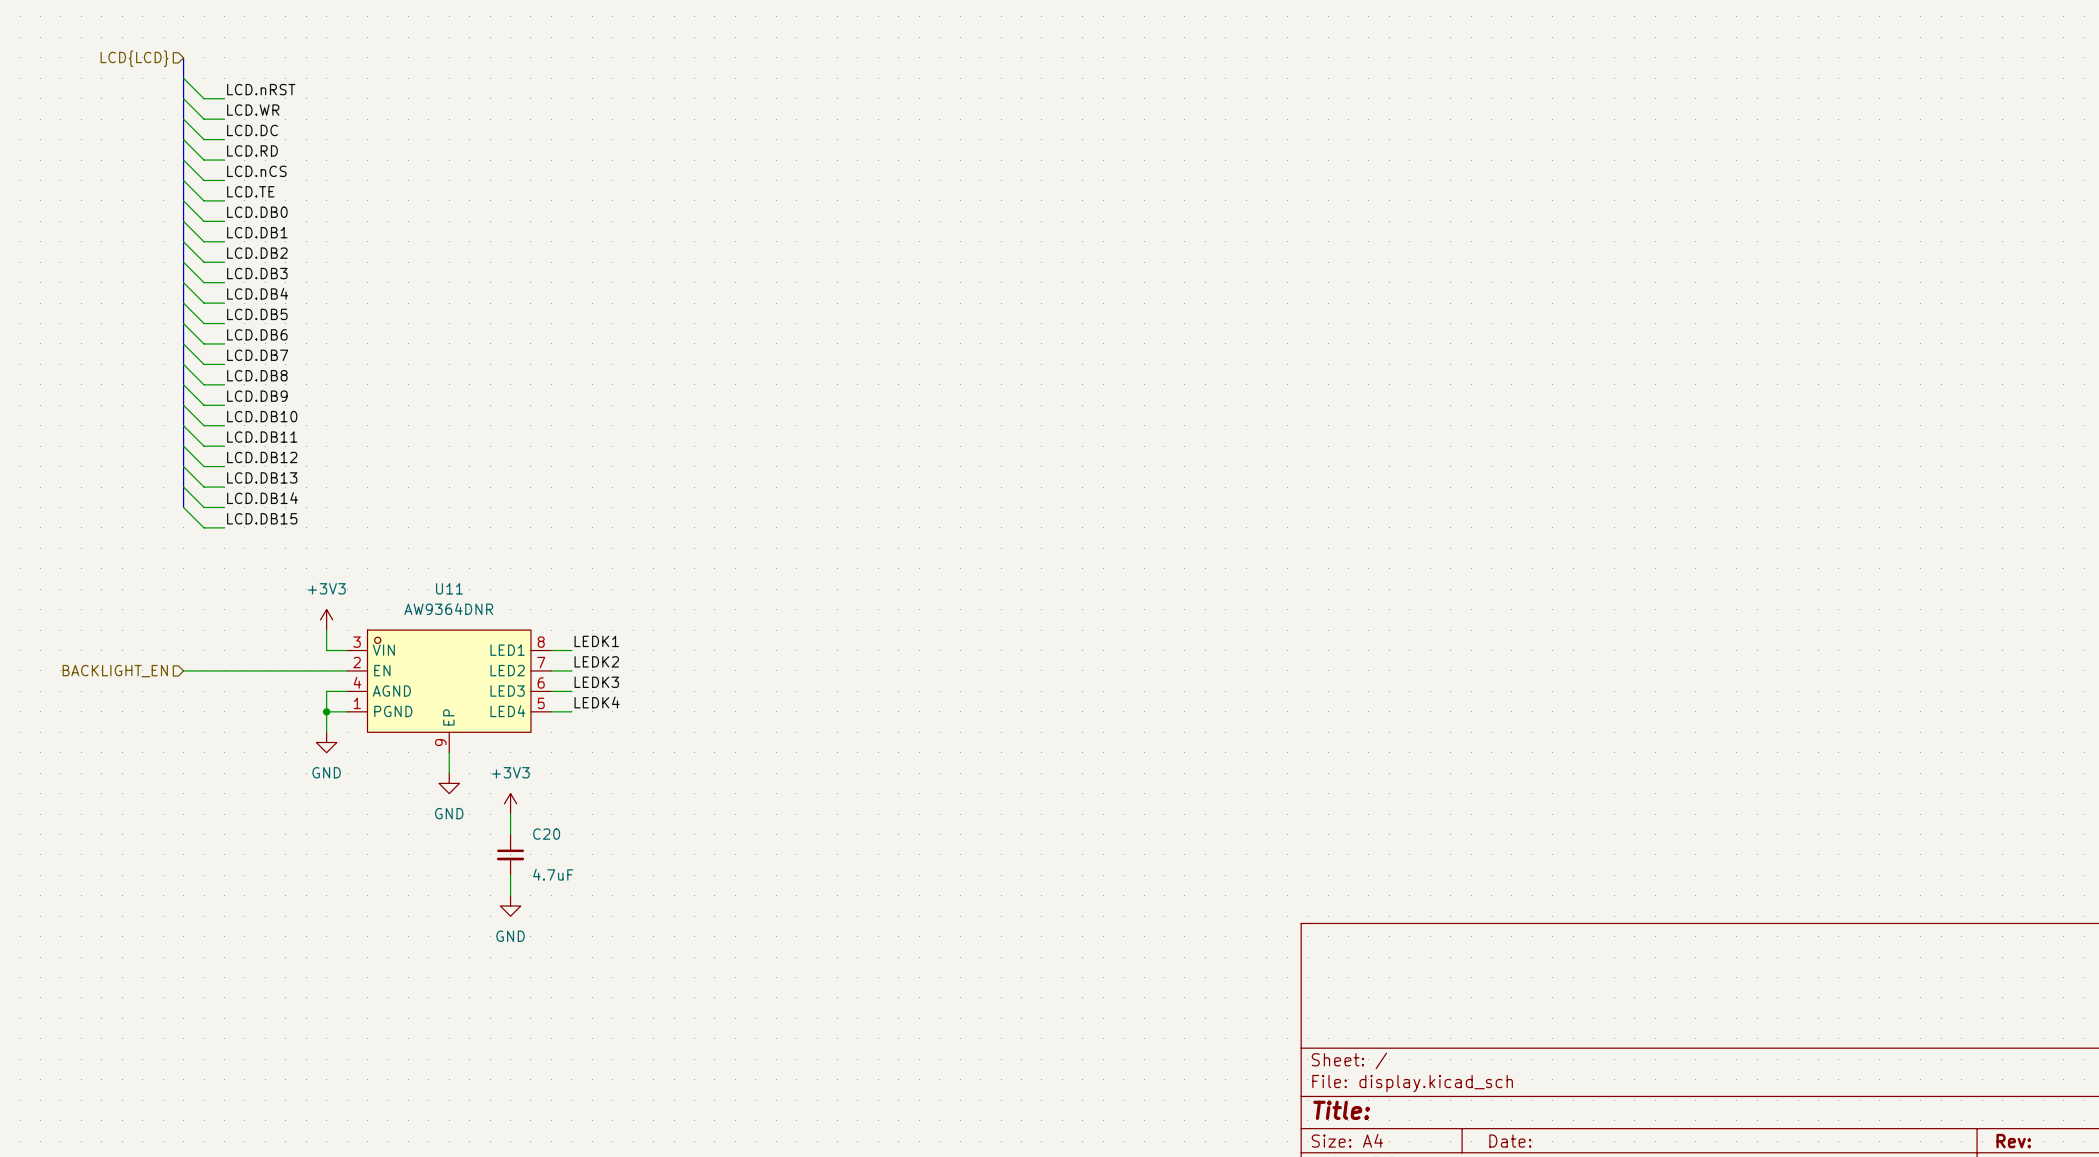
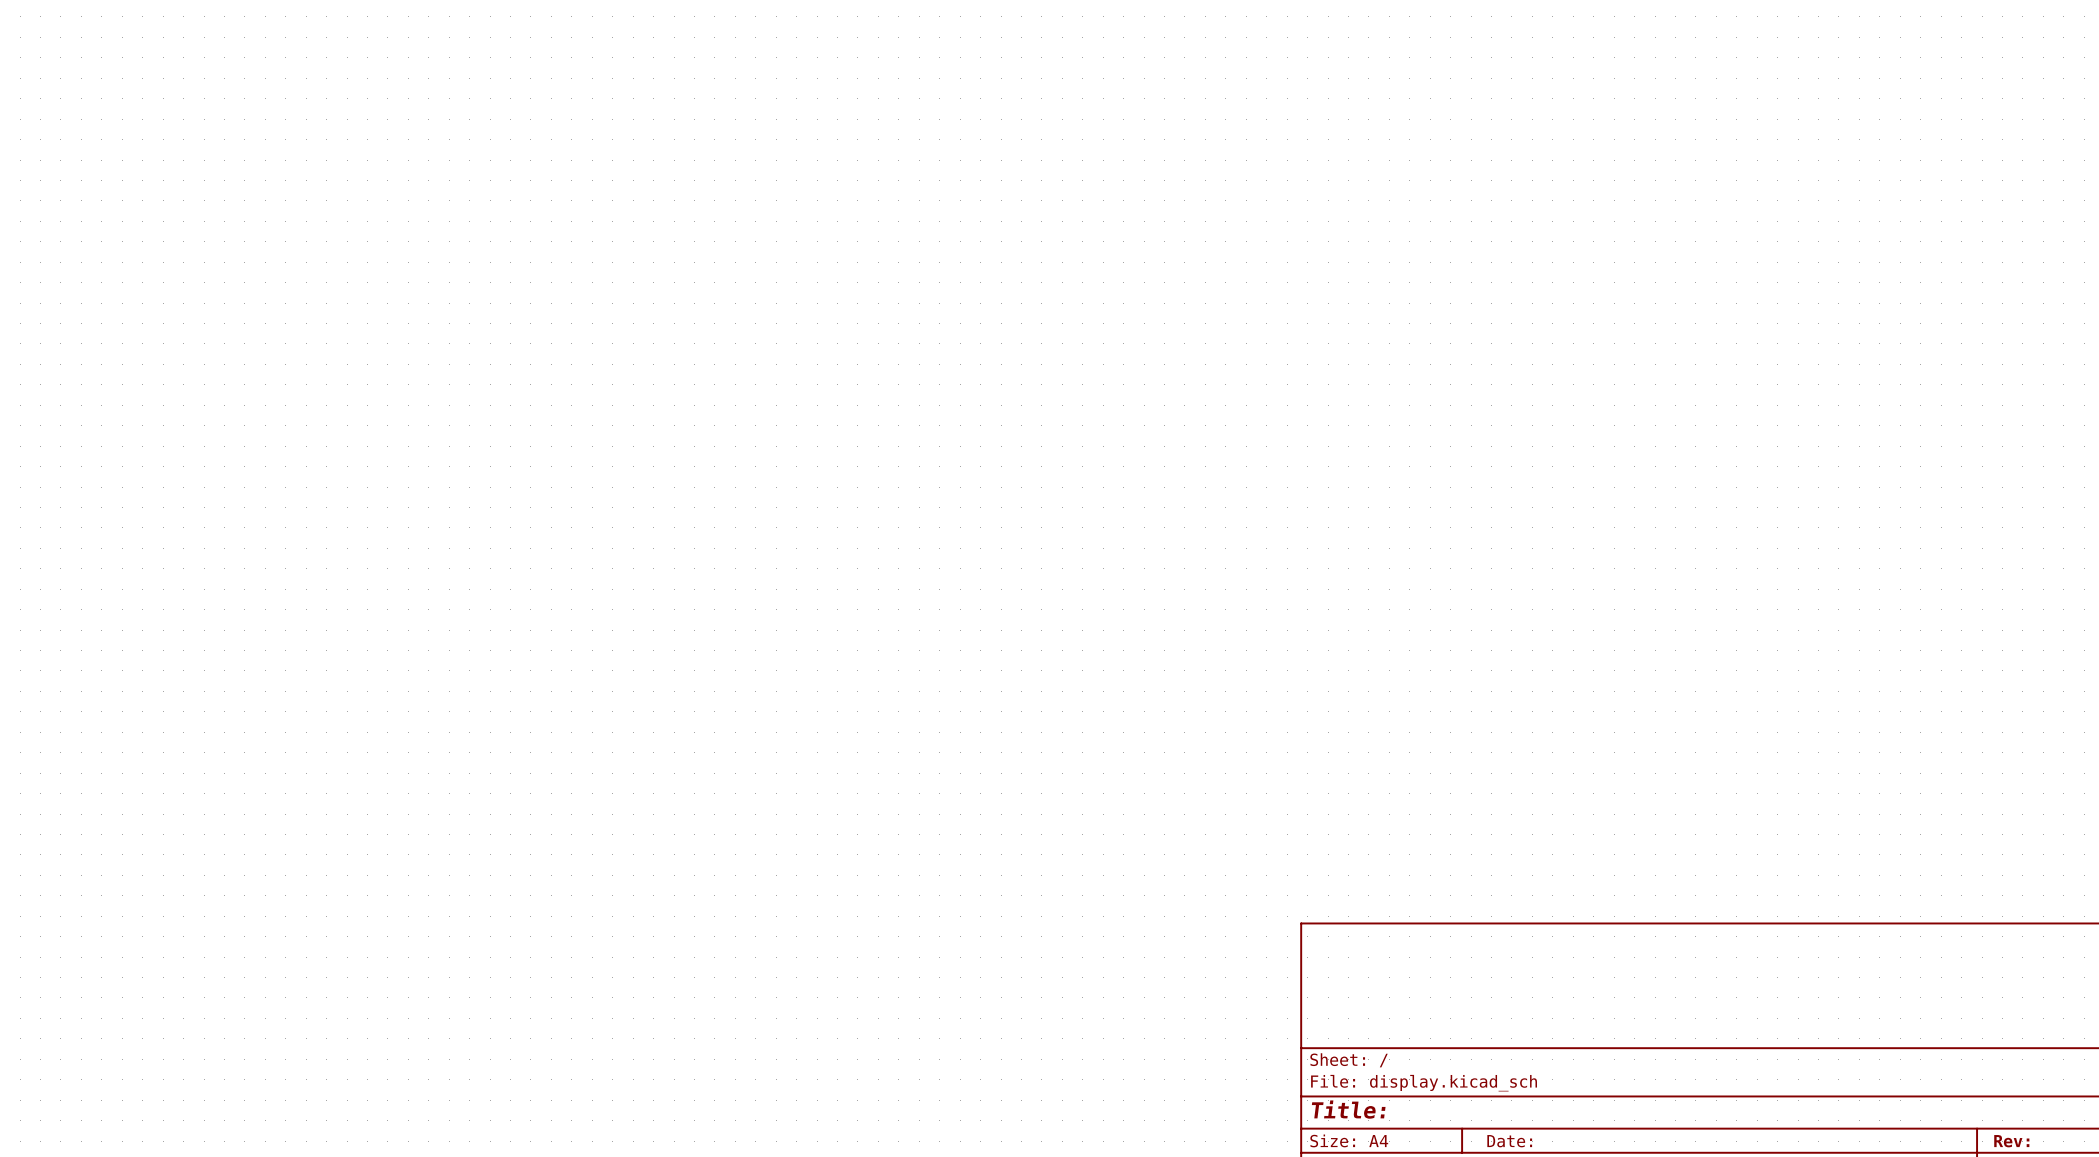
bus: (183, 57) (183, 507) -> none
hierarchical label: LCD{LCD} (134, 58) -> none
wire: (183, 78) (204, 98) (224, 98) -> none
label: LCD.nRST (261, 89) -> none
wire: (183, 98) (204, 119) (224, 119) -> none
label: LCD.WR (253, 110) -> none
wire: (183, 119) (204, 139) (224, 139) -> none
label: LCD.DC (252, 130) -> none
wire: (183, 139) (204, 160) (224, 160) -> none
label: LCD.RD (252, 150) -> none
wire: (183, 160) (204, 180) (224, 180) -> none
label: LCD.nCS (256, 171) -> none
wire: (183, 180) (204, 200) (224, 200) -> none
label: LCD.TE (250, 191) -> none
wire: (183, 200) (204, 221) (224, 221) -> none
label: LCD.DB0 (257, 212) -> none
wire: (183, 221) (204, 241) (224, 241) -> none
label: LCD.DB1 (257, 232) -> none
wire: (183, 241) (204, 262) (224, 262) -> none
label: LCD.DB2 (257, 253) -> none
wire: (183, 262) (204, 282) (224, 282) -> none
label: LCD.DB3 (257, 273) -> none
wire: (183, 282) (204, 303) (224, 303) -> none
label: LCD.DB4 (257, 293) -> none
wire: (183, 303) (204, 323) (224, 323) -> none
label: LCD.DB5 (257, 314) -> none
wire: (183, 323) (204, 343) (224, 343) -> none
label: LCD.DB6 (257, 334) -> none
wire: (183, 343) (204, 364) (224, 364) -> none
label: LCD.DB7 (257, 355) -> none
wire: (183, 364) (204, 384) (224, 384) -> none
label: LCD.DB8 (257, 375) -> none
wire: (183, 384) (204, 405) (224, 405) -> none
label: LCD.DB9 (257, 396) -> none
wire: (183, 405) (204, 425) (224, 425) -> none
label: LCD.DB10 (262, 416) -> none
wire: (183, 425) (204, 446) (224, 446) -> none
label: LCD.DB11 (262, 437) -> none
wire: (183, 446) (204, 466) (224, 466) -> none
label: LCD.DB12 (262, 457) -> none
wire: (183, 466) (204, 487) (224, 487) -> none
label: LCD.DB13 (262, 477) -> none
wire: (183, 487) (204, 507) (224, 507) -> none
label: LCD.DB14 (262, 498) -> none
wire: (183, 507) (204, 527) (224, 527) -> none
label: LCD.DB15 (262, 518) -> none
power symbol: +3V3 (326, 619) -> none
wire: (326, 630) (326, 650) (347, 650) -> none
label: LEDK1 (596, 641) -> none
wire: (551, 650) (571, 650) -> none
label: LEDK2 (596, 661) -> none
wire: (183, 670) (347, 670) -> none
wire: (551, 670) (571, 670) -> none
hierarchical label: BACKLIGHT_EN (115, 671) -> none
label: LEDK3 (596, 682) -> none
wire: (347, 691) (326, 691) (326, 732) -> none
U11: AW9364DNR (449, 691) -> none
wire: (551, 691) (571, 691) -> none
label: LEDK4 (597, 702) -> none
wire: (326, 711) (347, 711) -> none
junction: (326, 711) -> none
wire: (551, 711) (571, 711) -> none
power symbol: GND (326, 742) -> none
wire: (449, 752) (449, 773) -> none
power symbol: GND (449, 783) -> none
power symbol: +3V3 (510, 803) -> none
wire: (510, 814) (510, 834) -> none
C20: 4.7uF (510, 854) -> none
wire: (510, 875) (510, 895) -> none
power symbol: GND (510, 906) -> none

